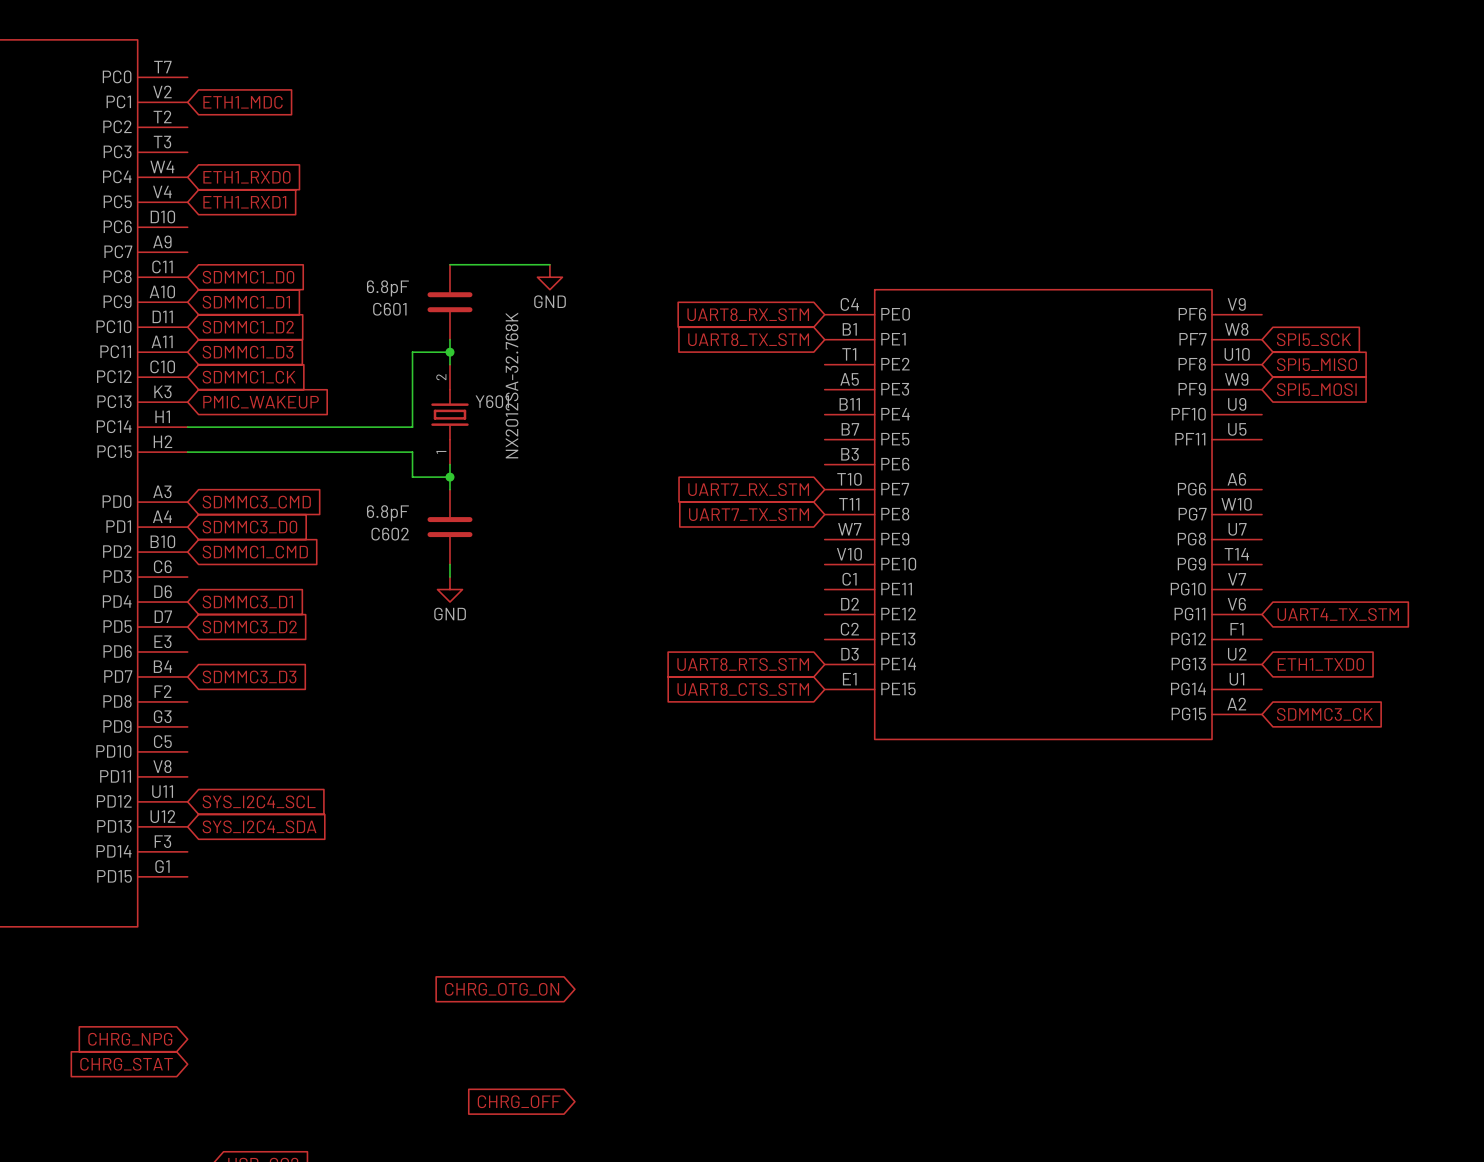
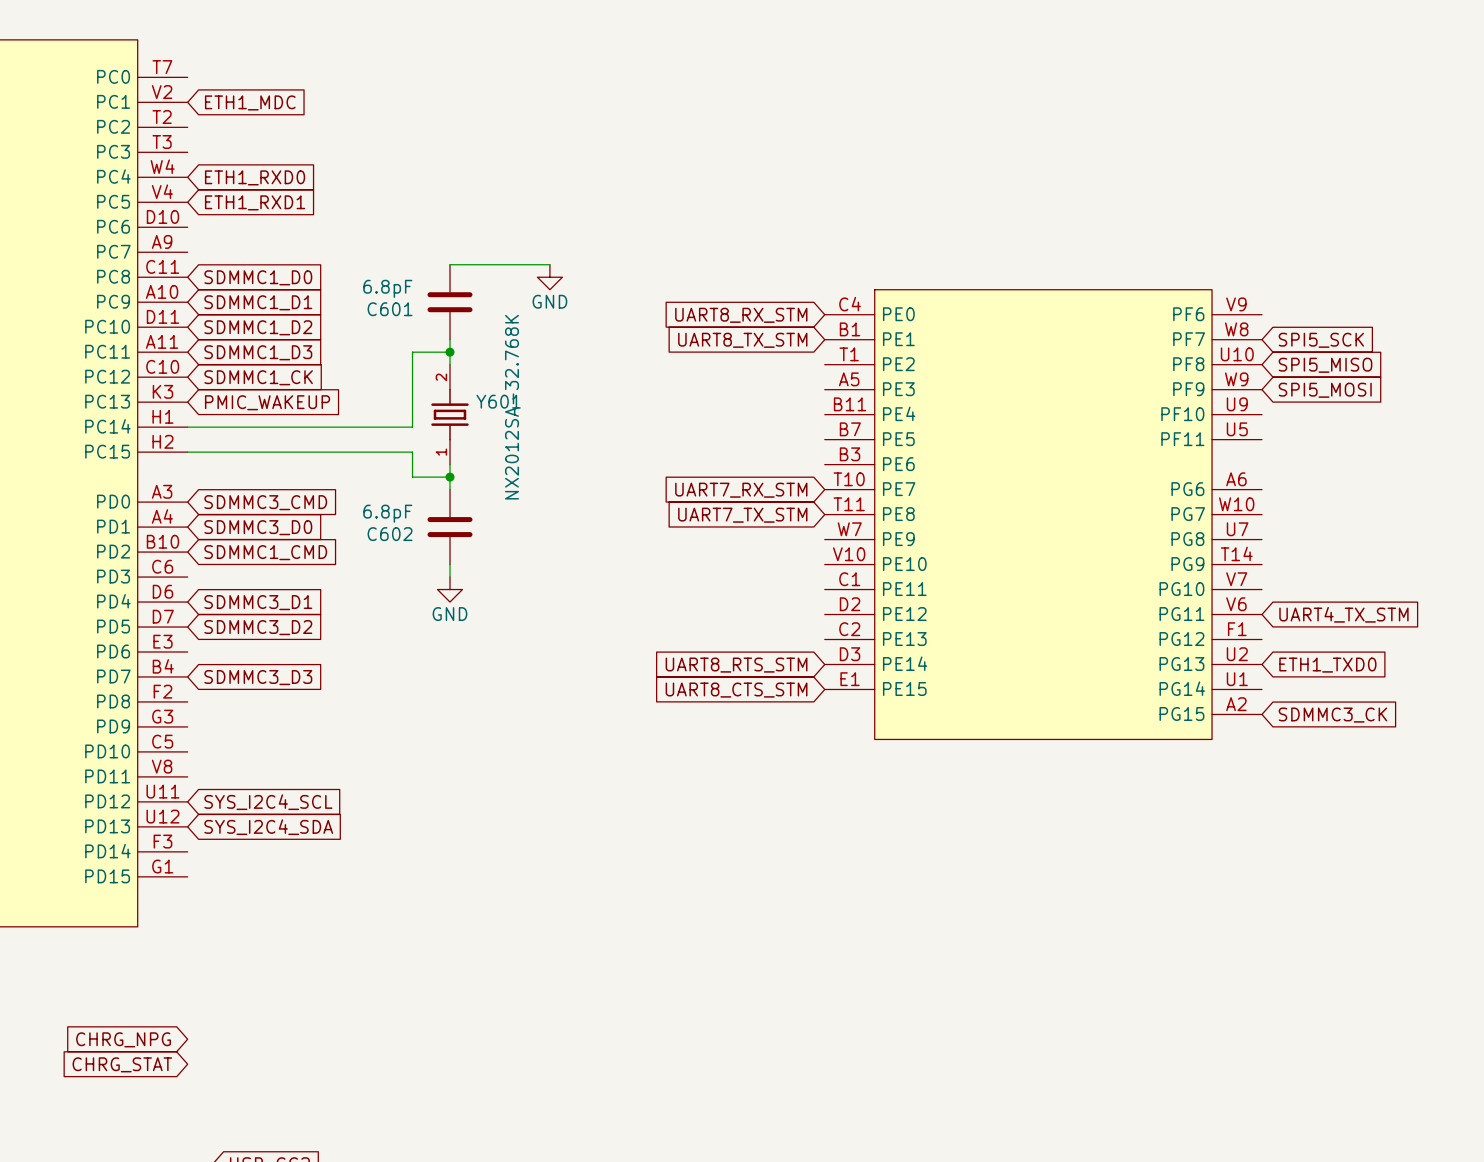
global label: CHRG_OTG_ON (502, 989) -> none
global label: CHRG_OFF (519, 1101) -> none

